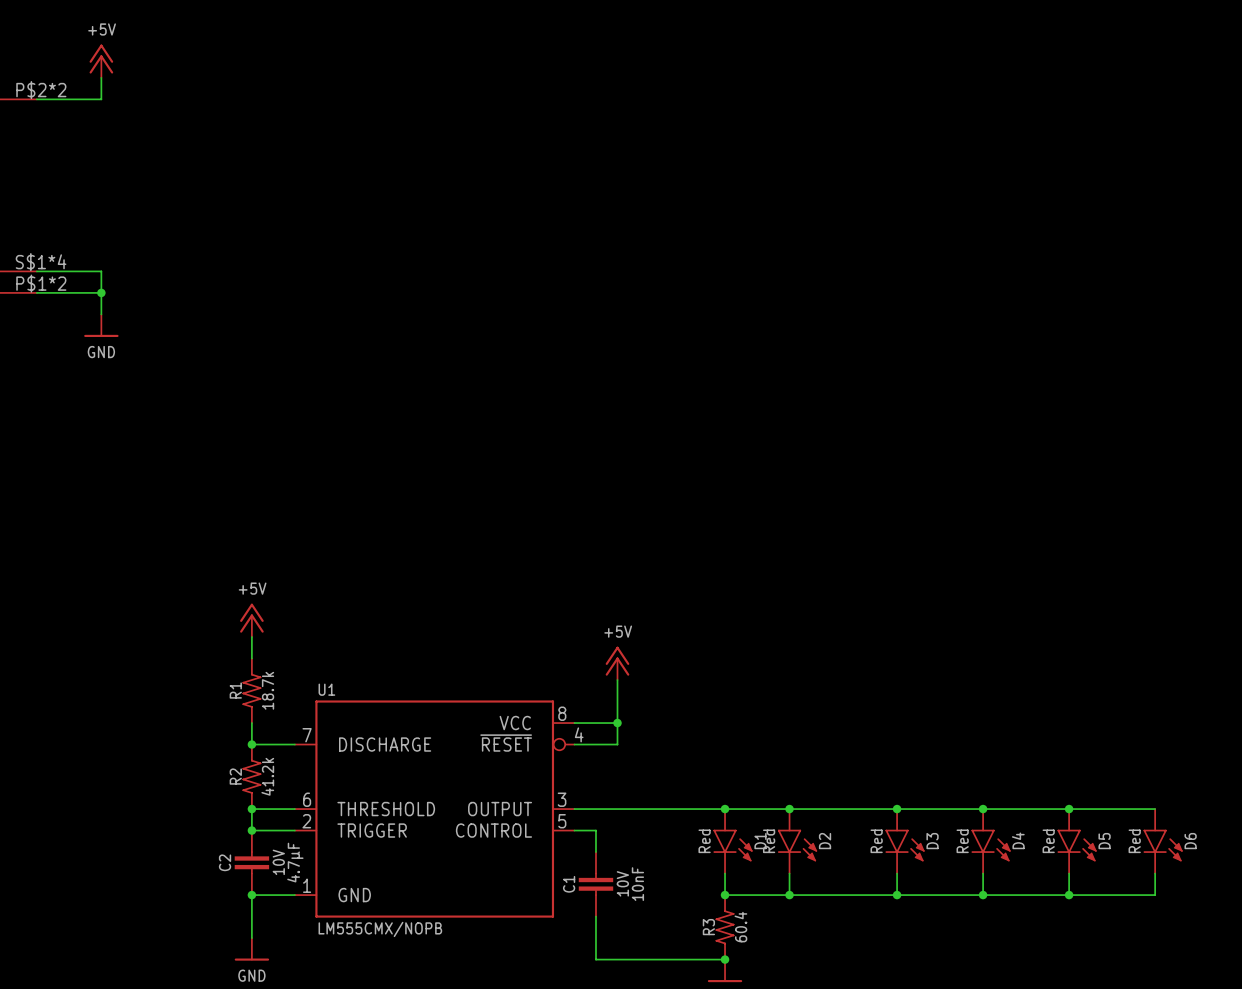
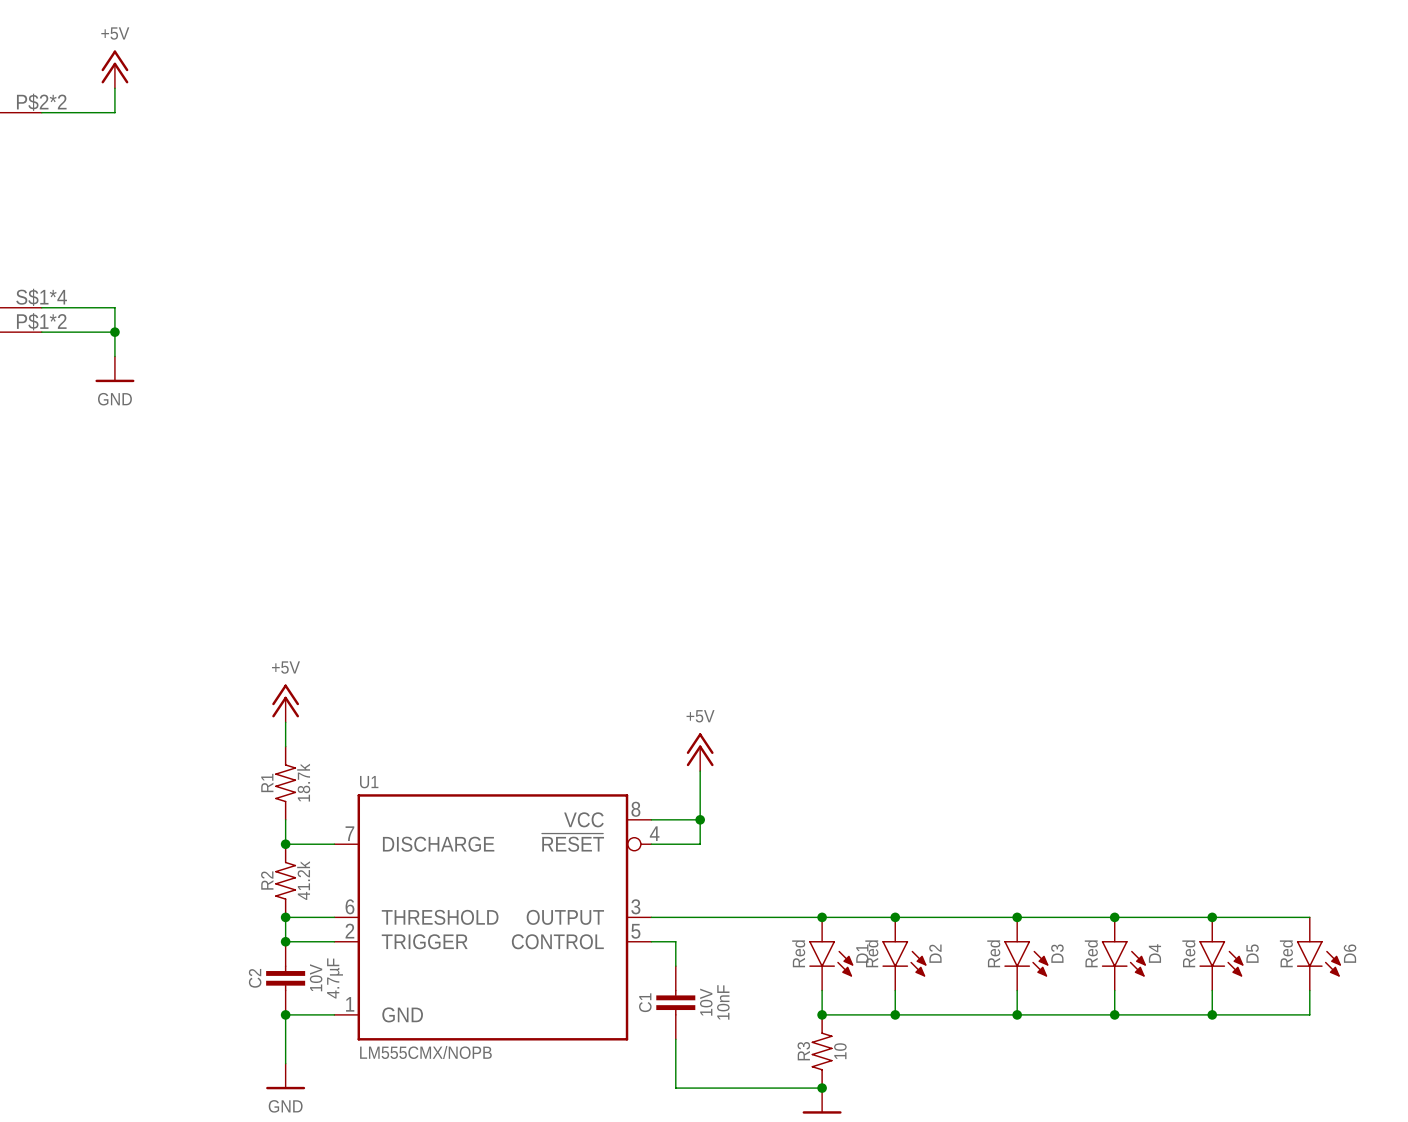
R3 text: 60.4 (740, 927) -> 10 (840, 1051)

